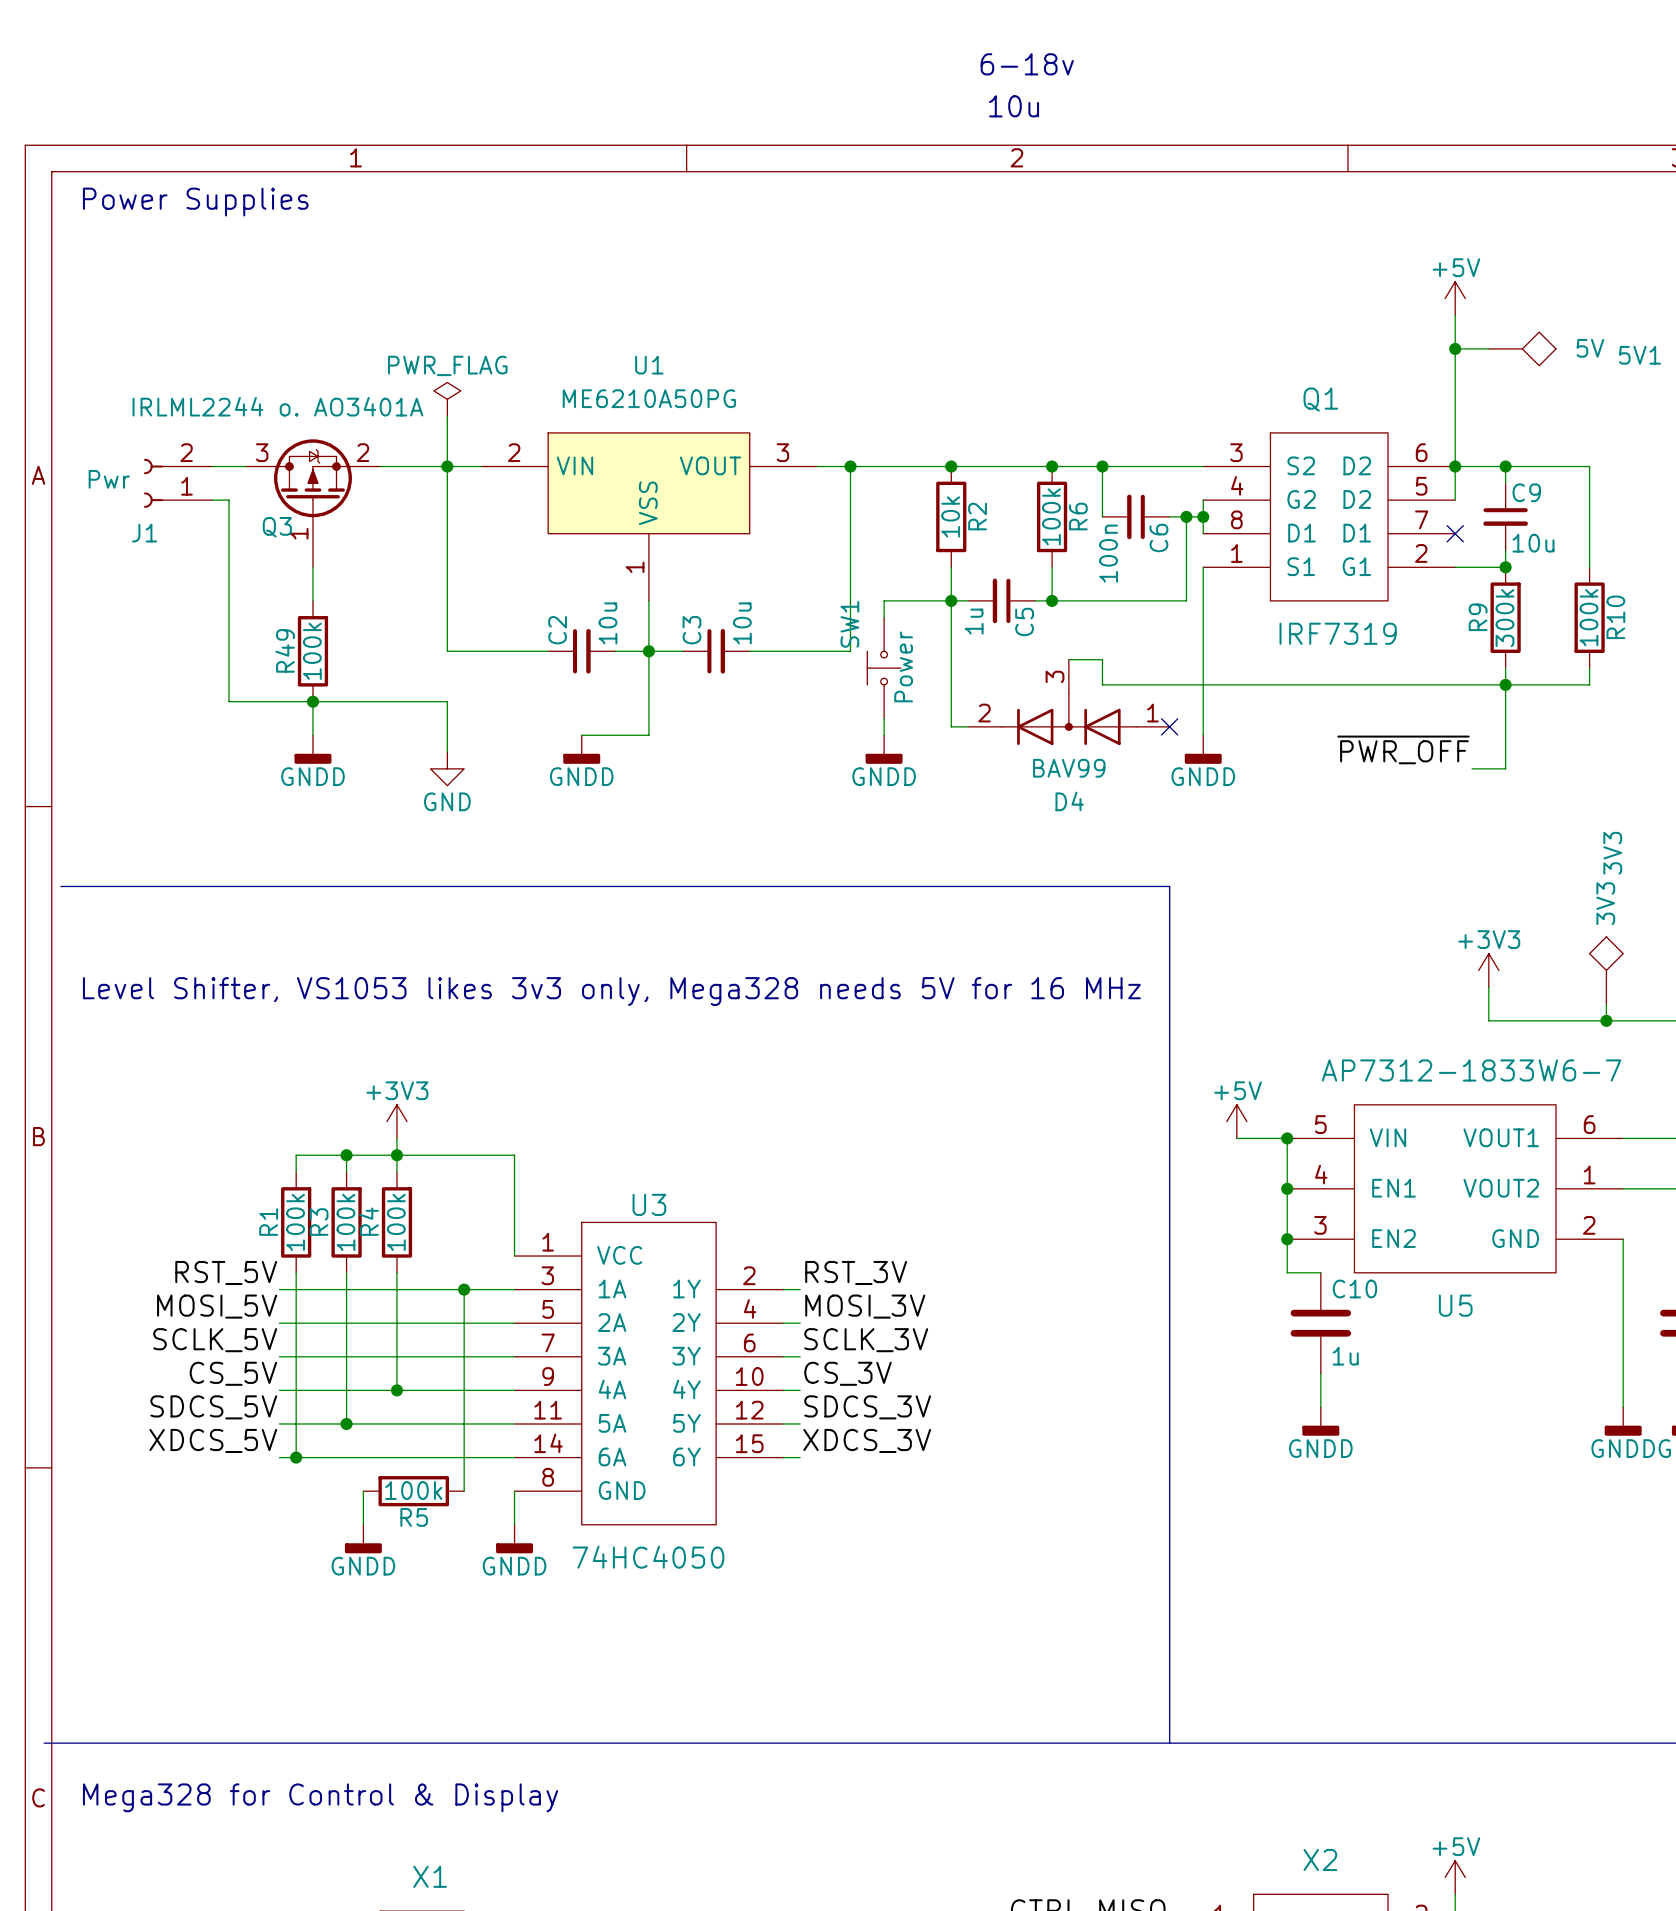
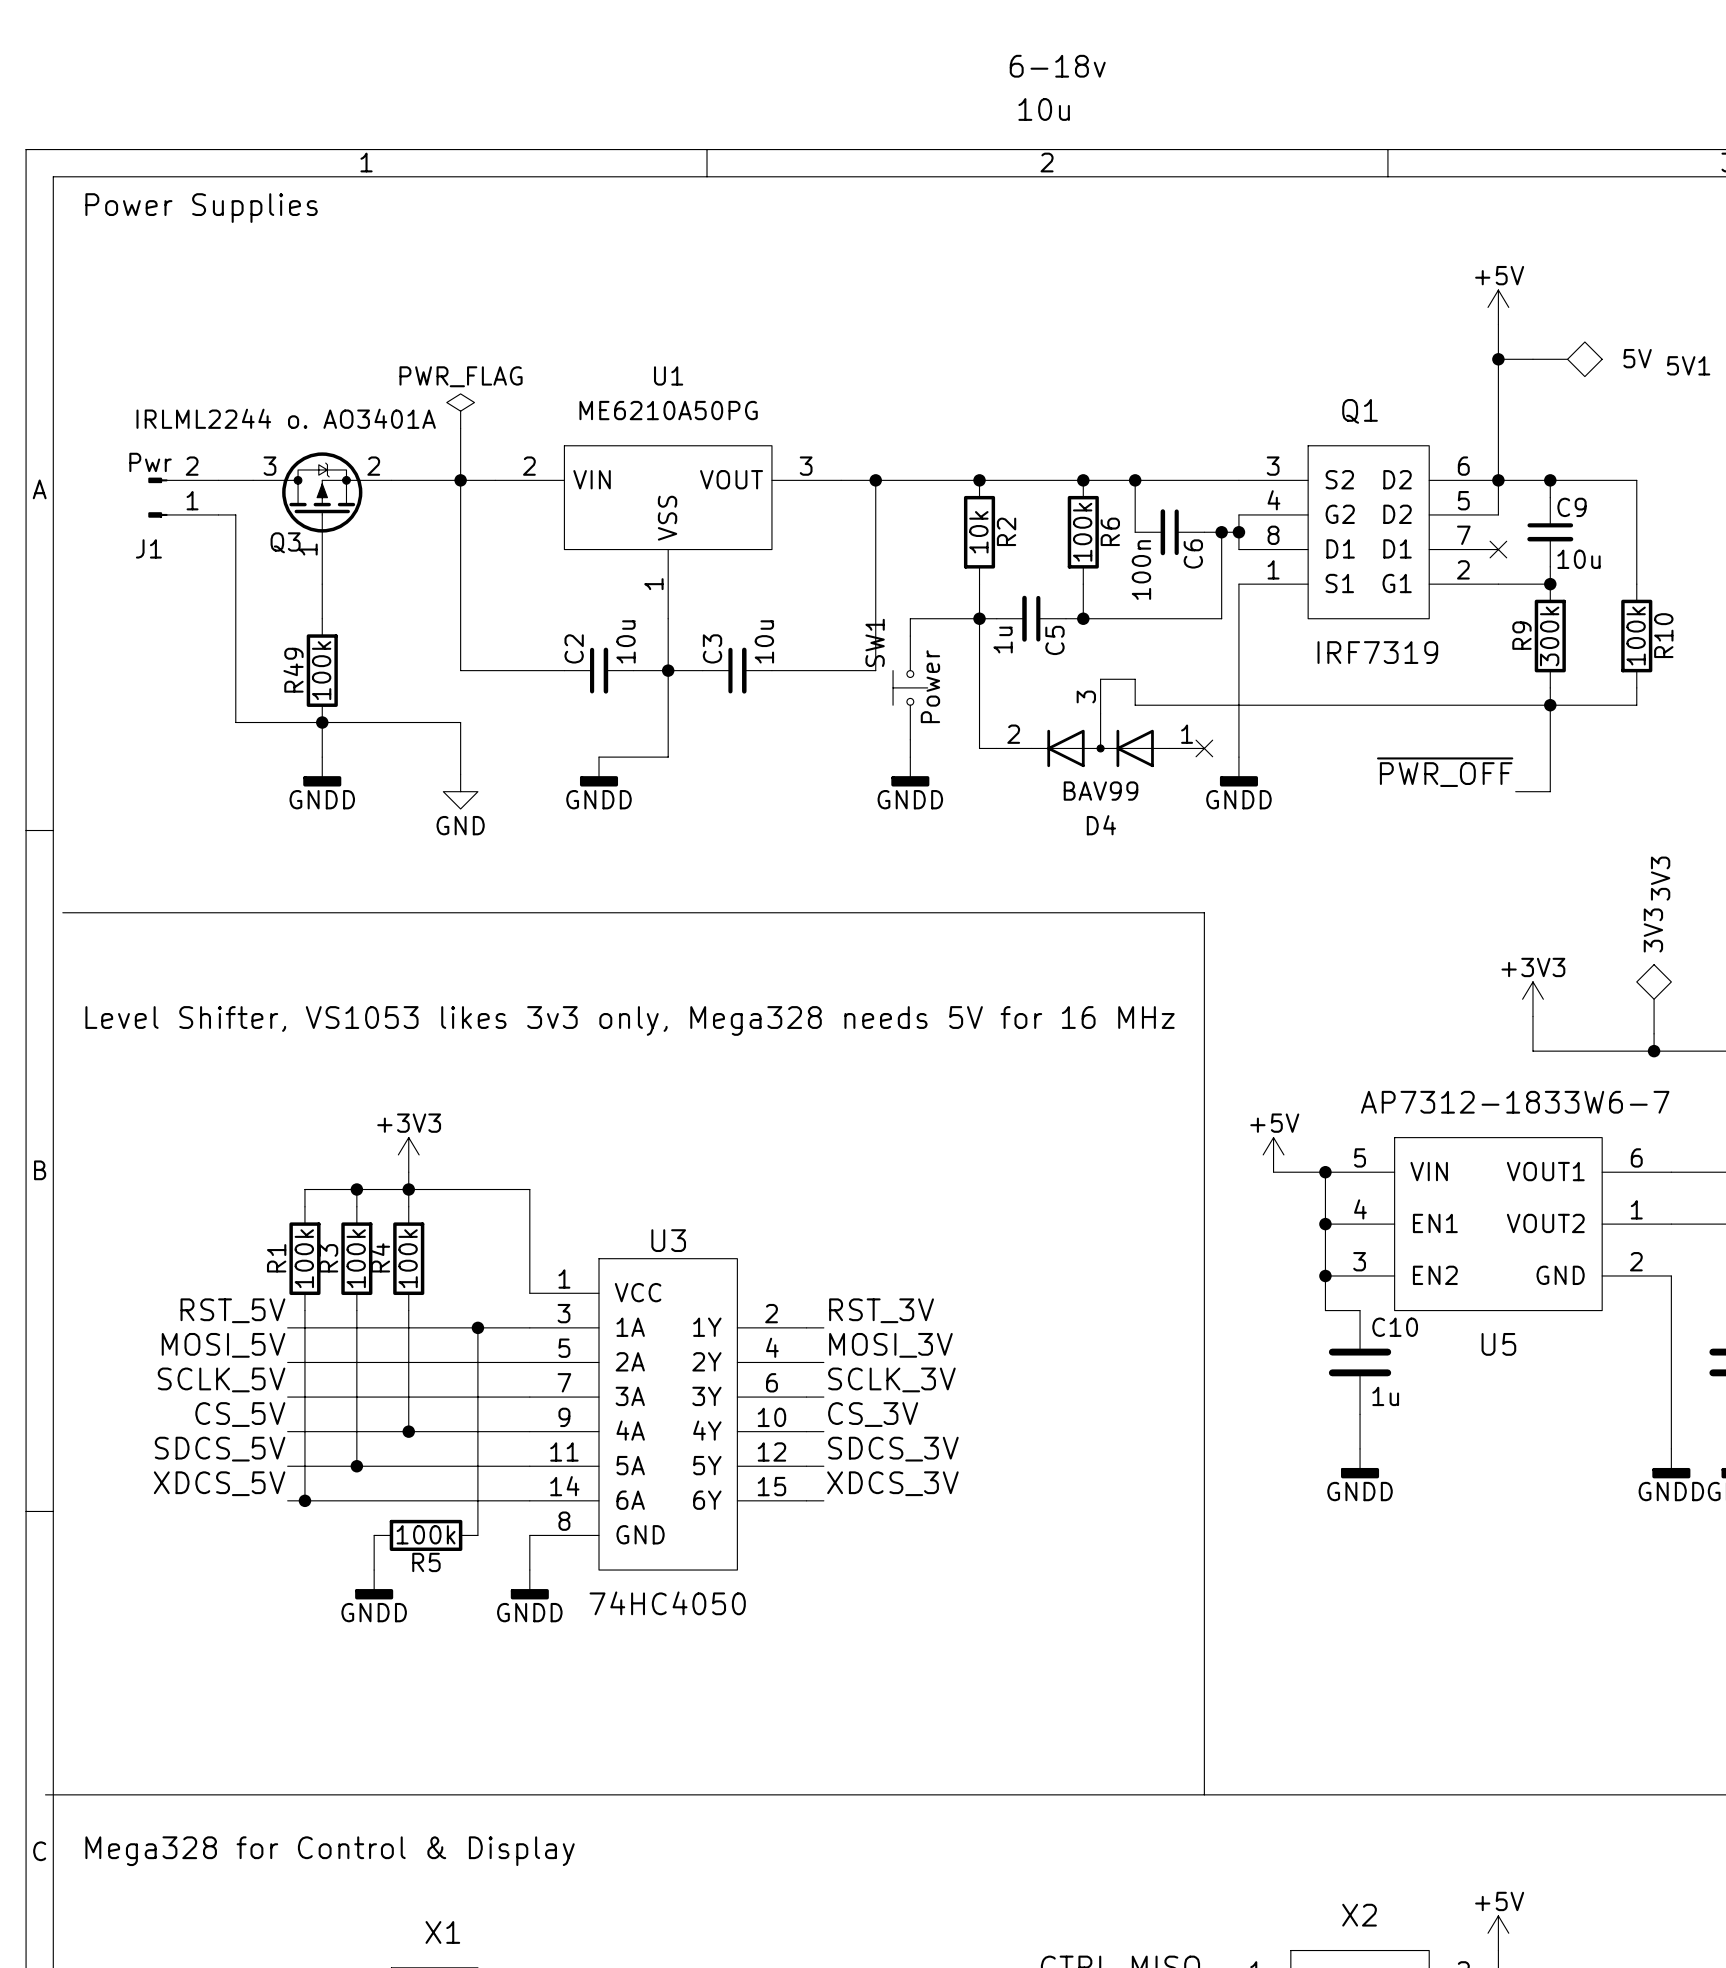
J1 symbol: [143, 458, 213, 508] -> [148, 477, 219, 518]
J1 value position: Pwr (109, 479) -> Pwr (150, 462)

